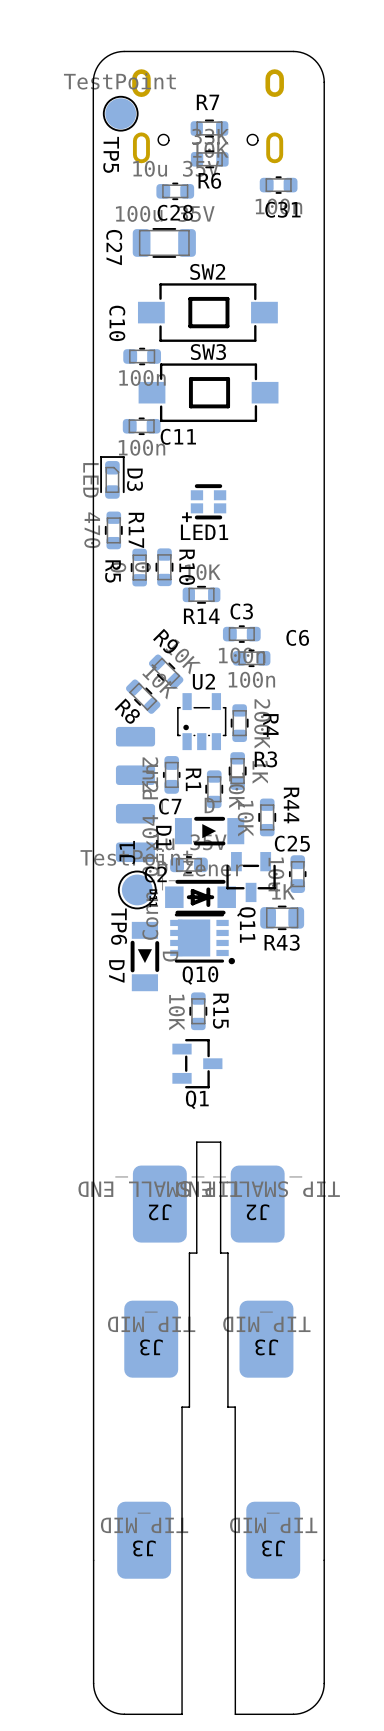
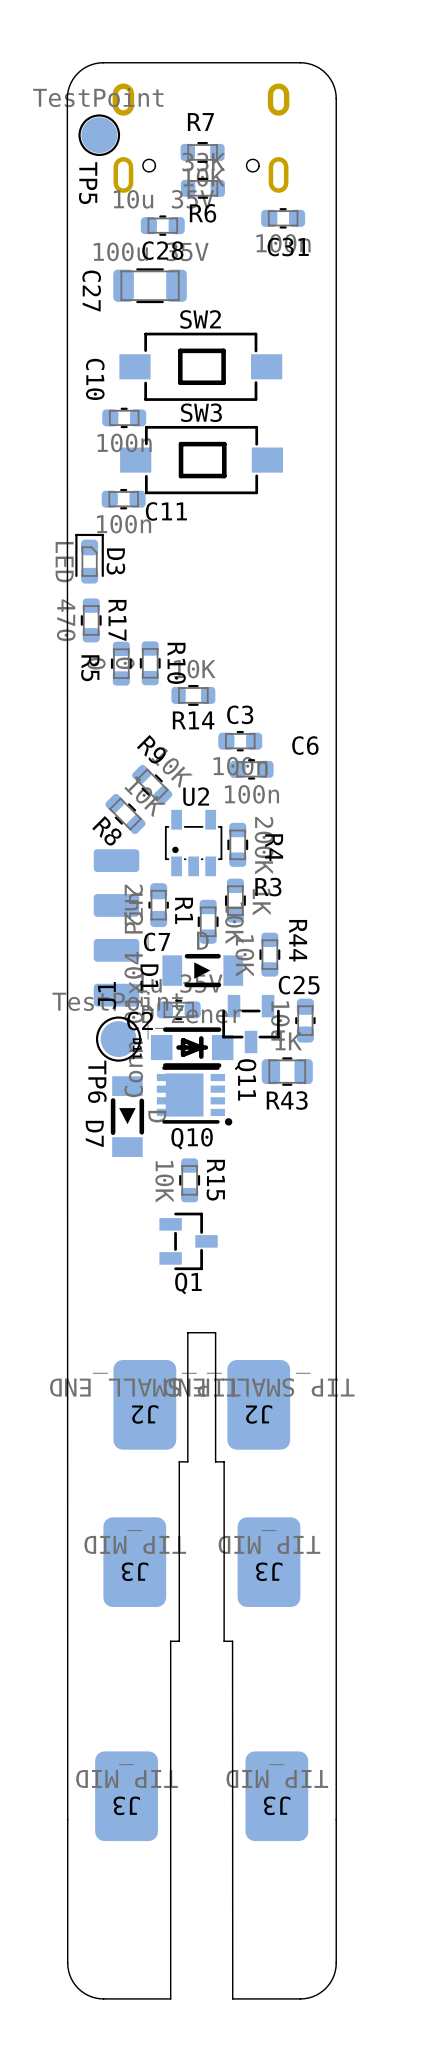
LED1: (204, 503) -> none

